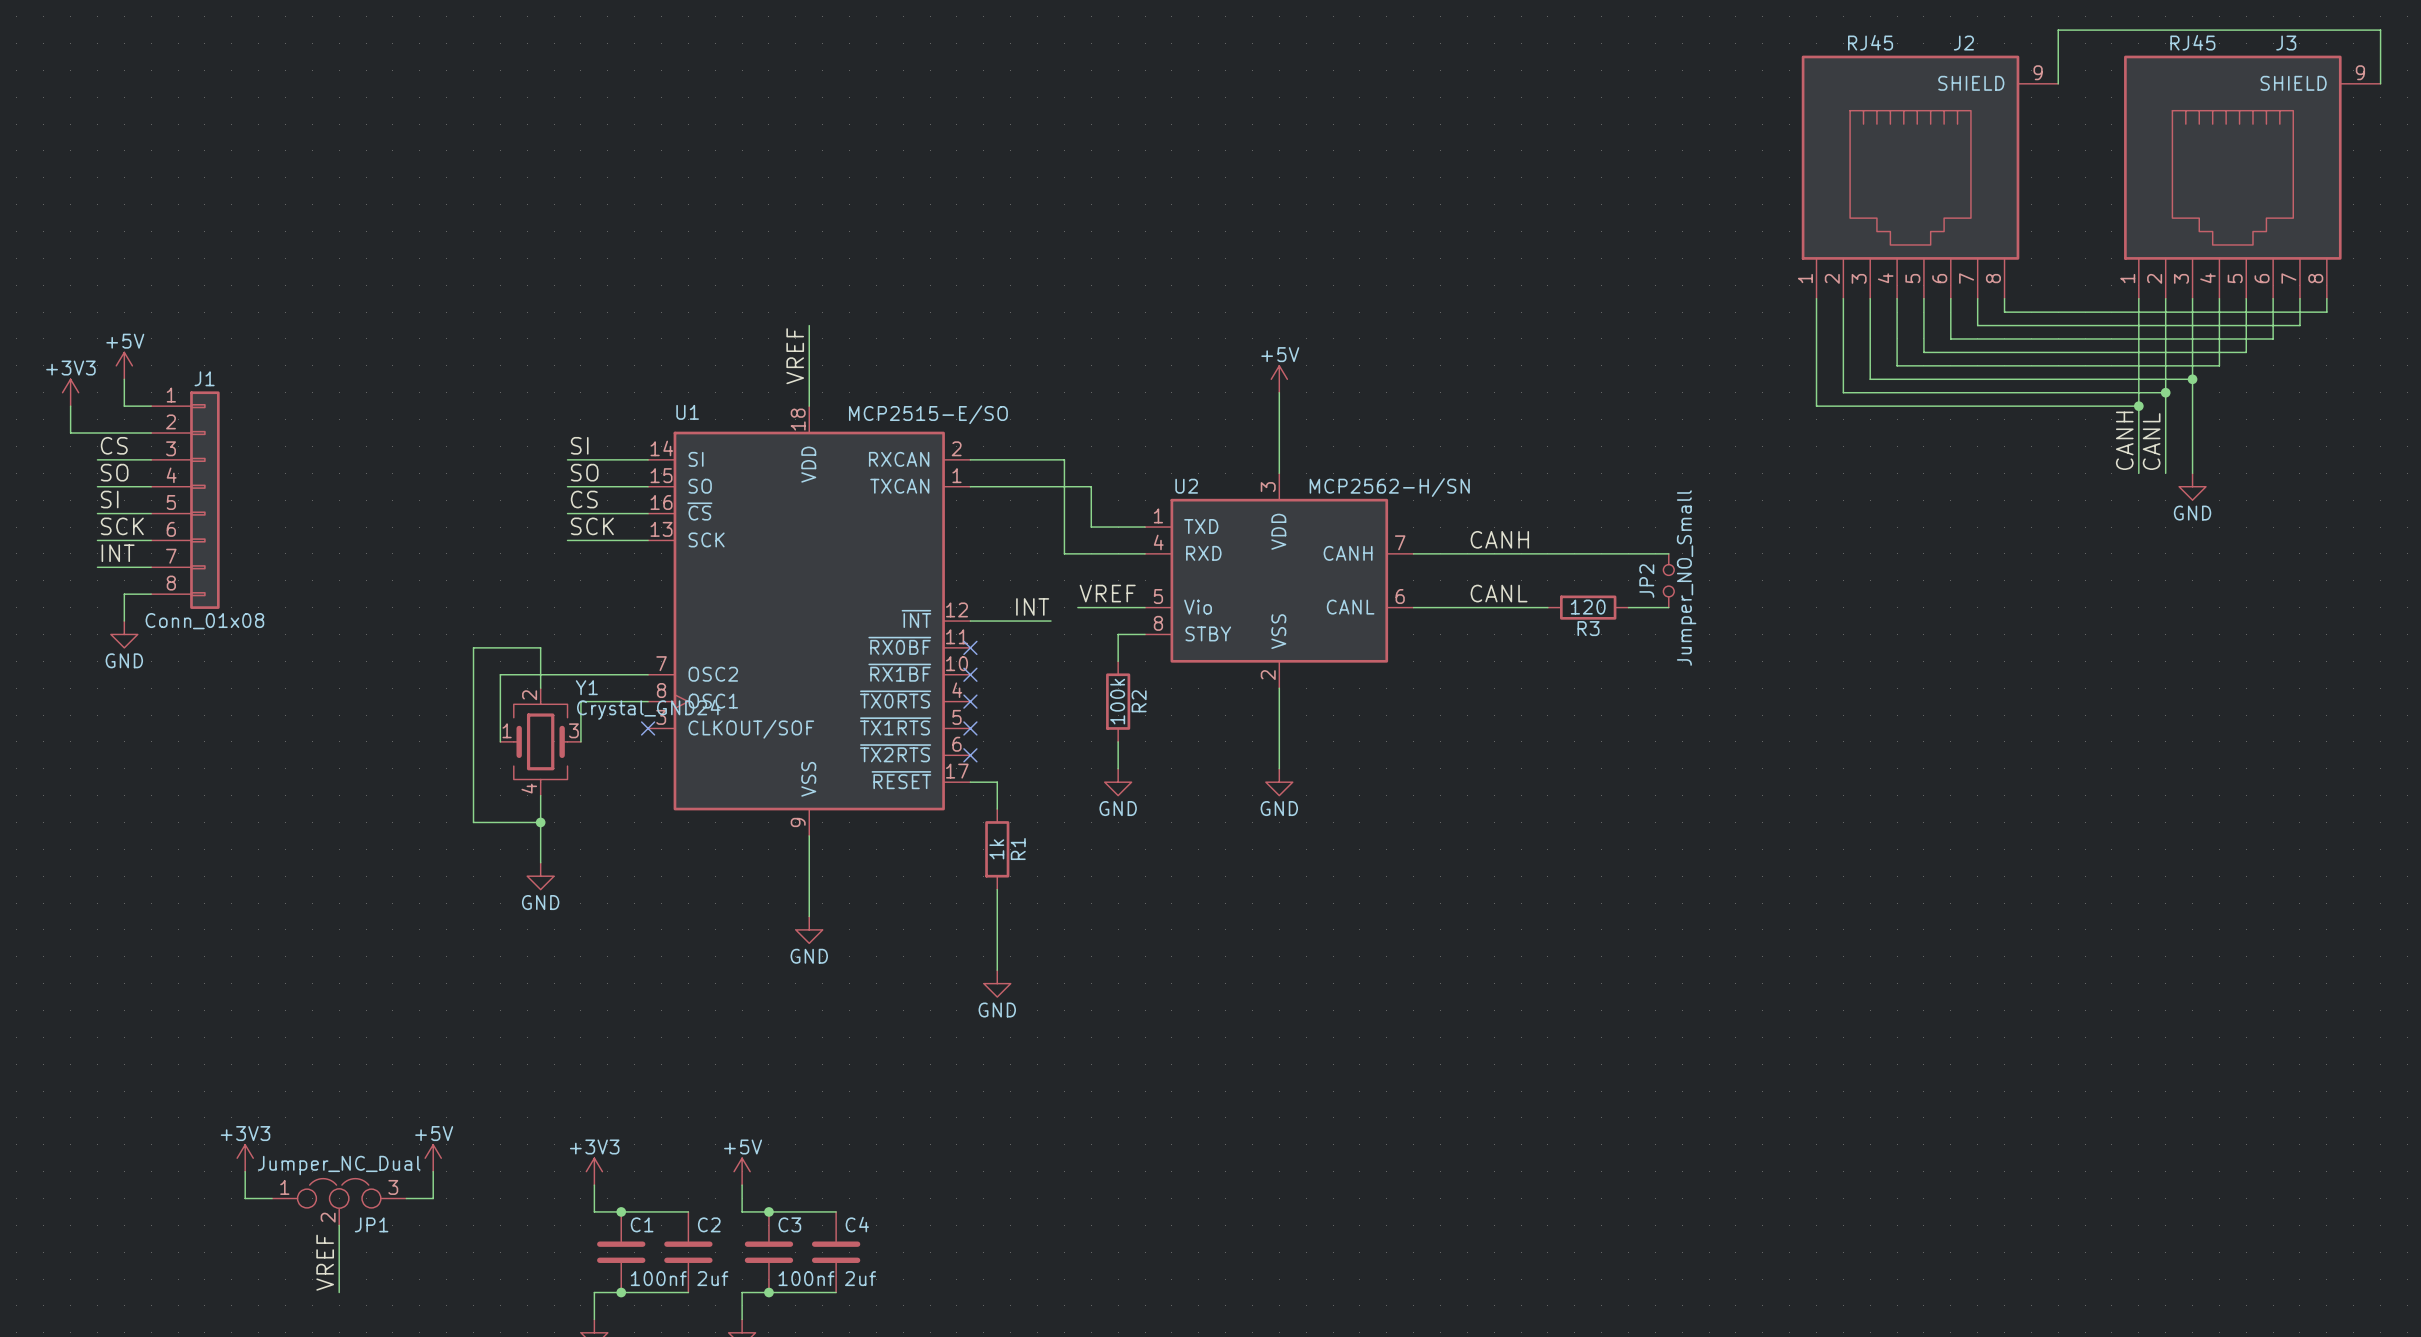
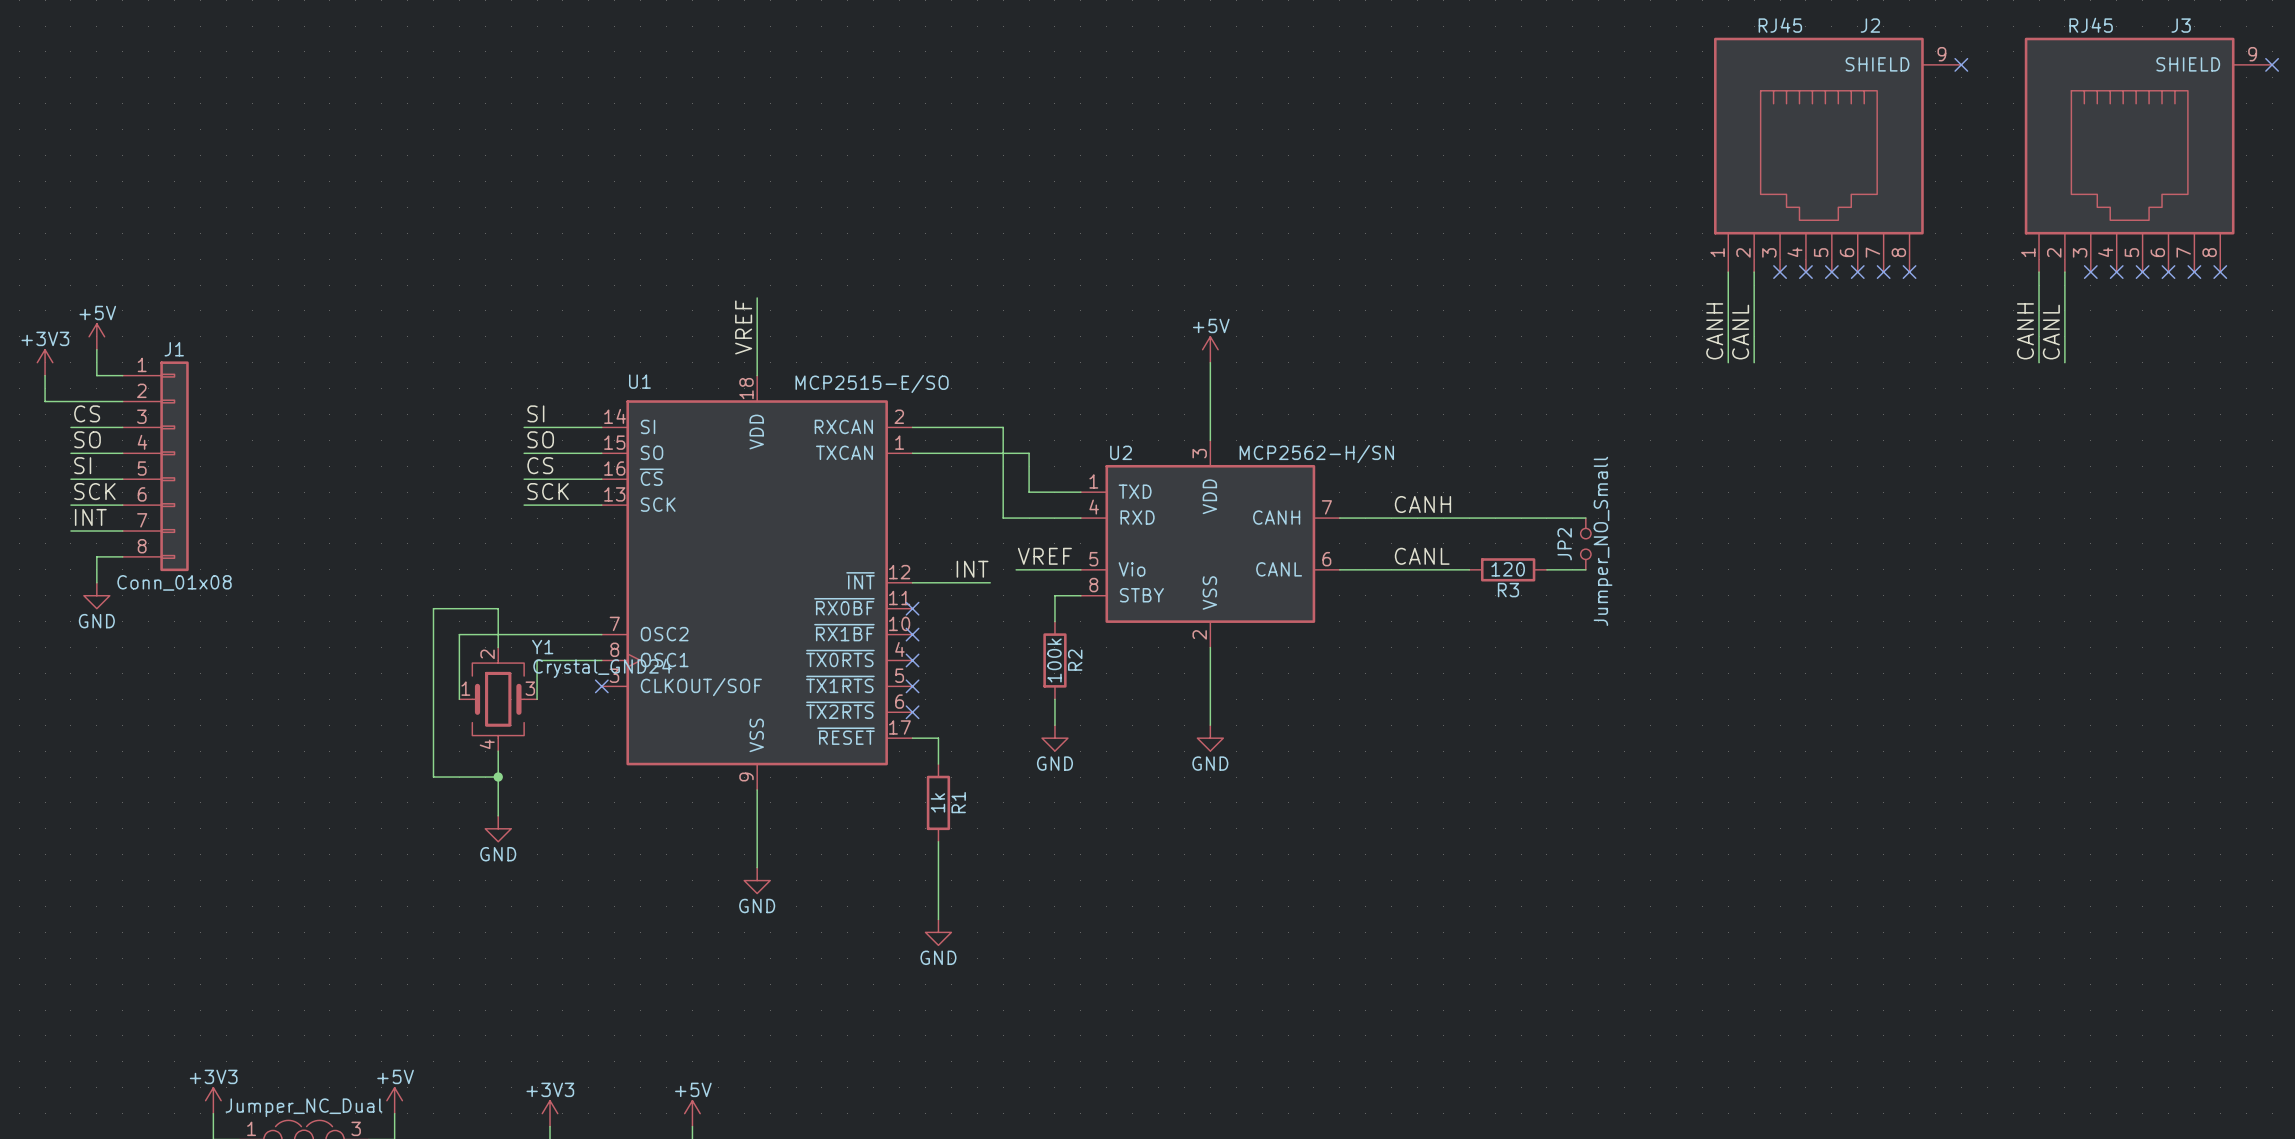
wire: (2058, 83) (2058, 30) (2380, 30) (2380, 83) -> none
no-connect mark: none -> (1961, 64)
no-connect mark: none -> (2272, 64)
wire: (1870, 298) (1870, 379) (2192, 379) -> none
no-connect mark: none -> (1780, 272)
wire: (1897, 298) (1897, 365) (2219, 365) (2219, 298) -> none
no-connect mark: none -> (1805, 272)
wire: (1923, 298) (1923, 352) (2246, 352) (2246, 298) -> none
no-connect mark: none -> (1831, 272)
wire: (1950, 298) (1950, 338) (2273, 338) (2273, 298) -> none
no-connect mark: none -> (1857, 272)
wire: (1977, 298) (1977, 325) (2299, 325) (2299, 298) -> none
no-connect mark: none -> (1883, 272)
wire: (2004, 298) (2004, 312) (2326, 312) (2326, 298) -> none
no-connect mark: none -> (1909, 272)
wire: (2192, 298) (2192, 473) -> none
no-connect mark: none -> (2090, 272)
no-connect mark: none -> (2116, 272)
no-connect mark: none -> (2142, 272)
no-connect mark: none -> (2168, 272)
no-connect mark: none -> (2194, 272)
no-connect mark: none -> (2220, 272)
label: none -> CANH (1714, 331)
label: none -> CANL (1740, 332)
junction: (2192, 379) -> none
wire: (1816, 392) (1816, 406) (2138, 406) -> none
wire: (1843, 392) (2165, 392) (2165, 473) -> none
wire: (2138, 392) (2138, 473) -> none
junction: (2165, 392) -> none
junction: (2138, 406) -> none
label position: CANH (2124, 440) -> CANH (2025, 331)
label position: CANL (2151, 441) -> CANL (2051, 332)
power symbol: GND (2192, 486) -> none

